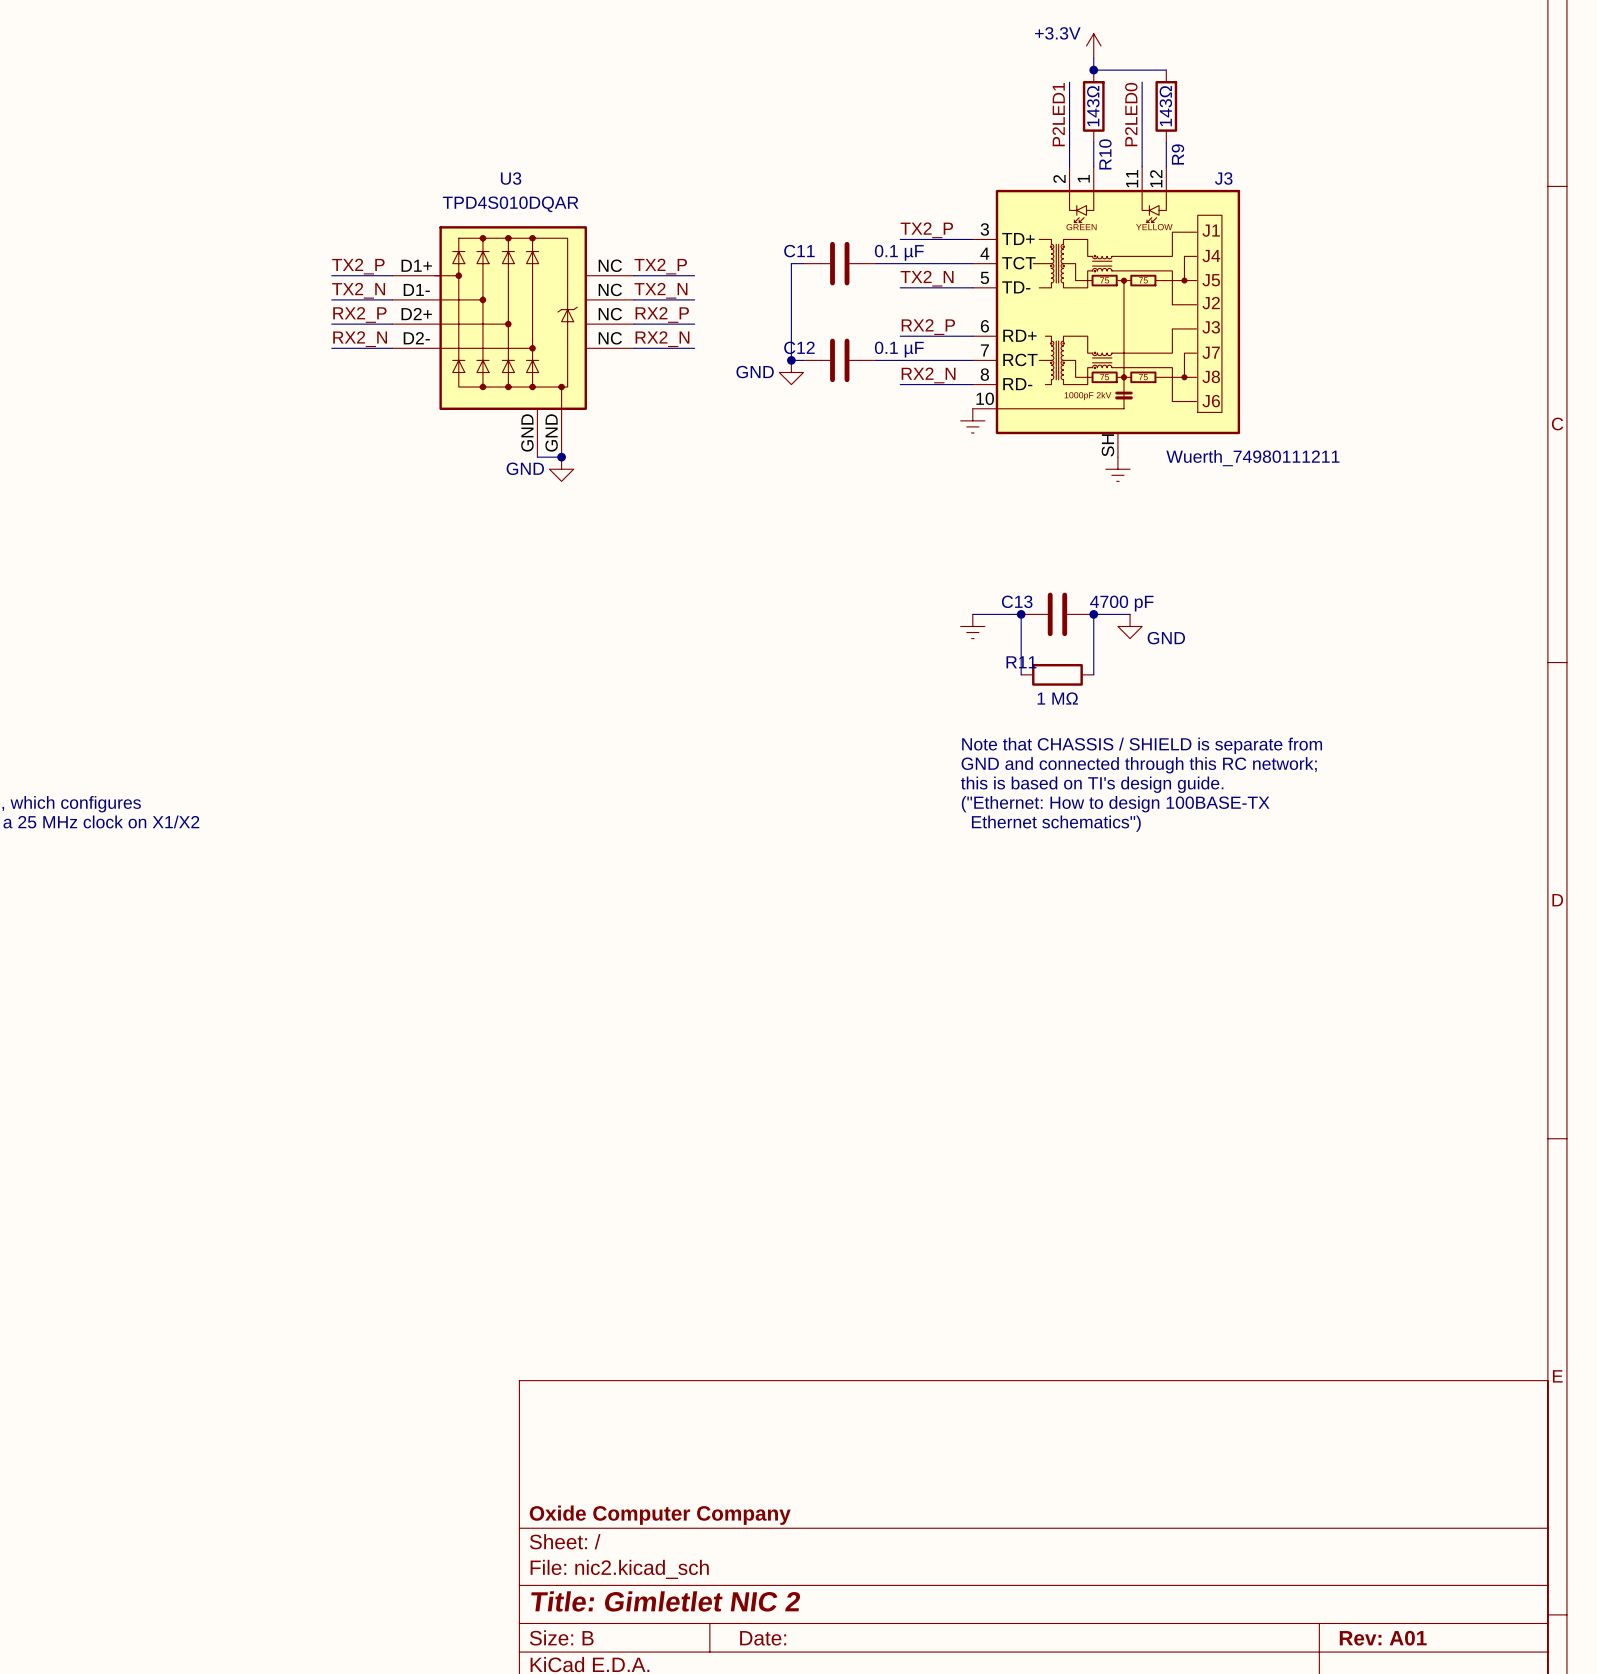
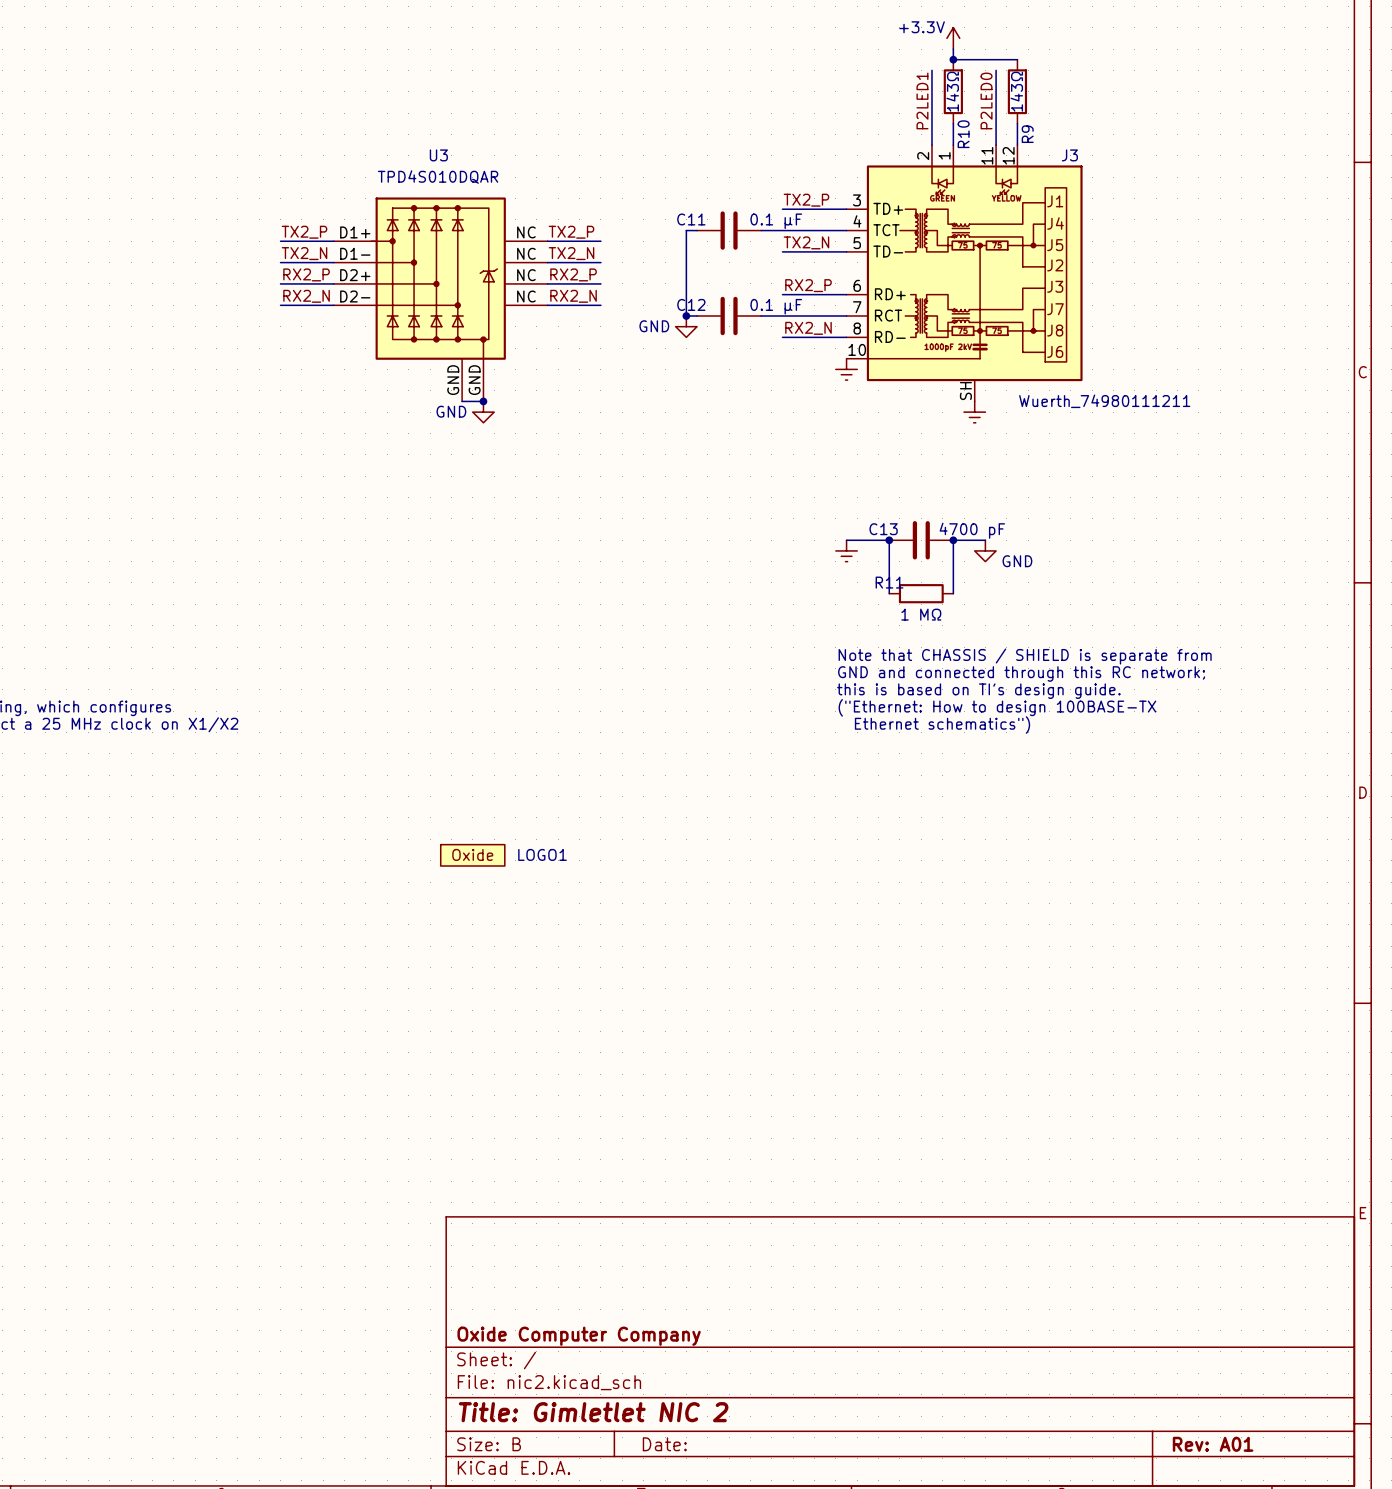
LOGO1: none -> (472, 855)

